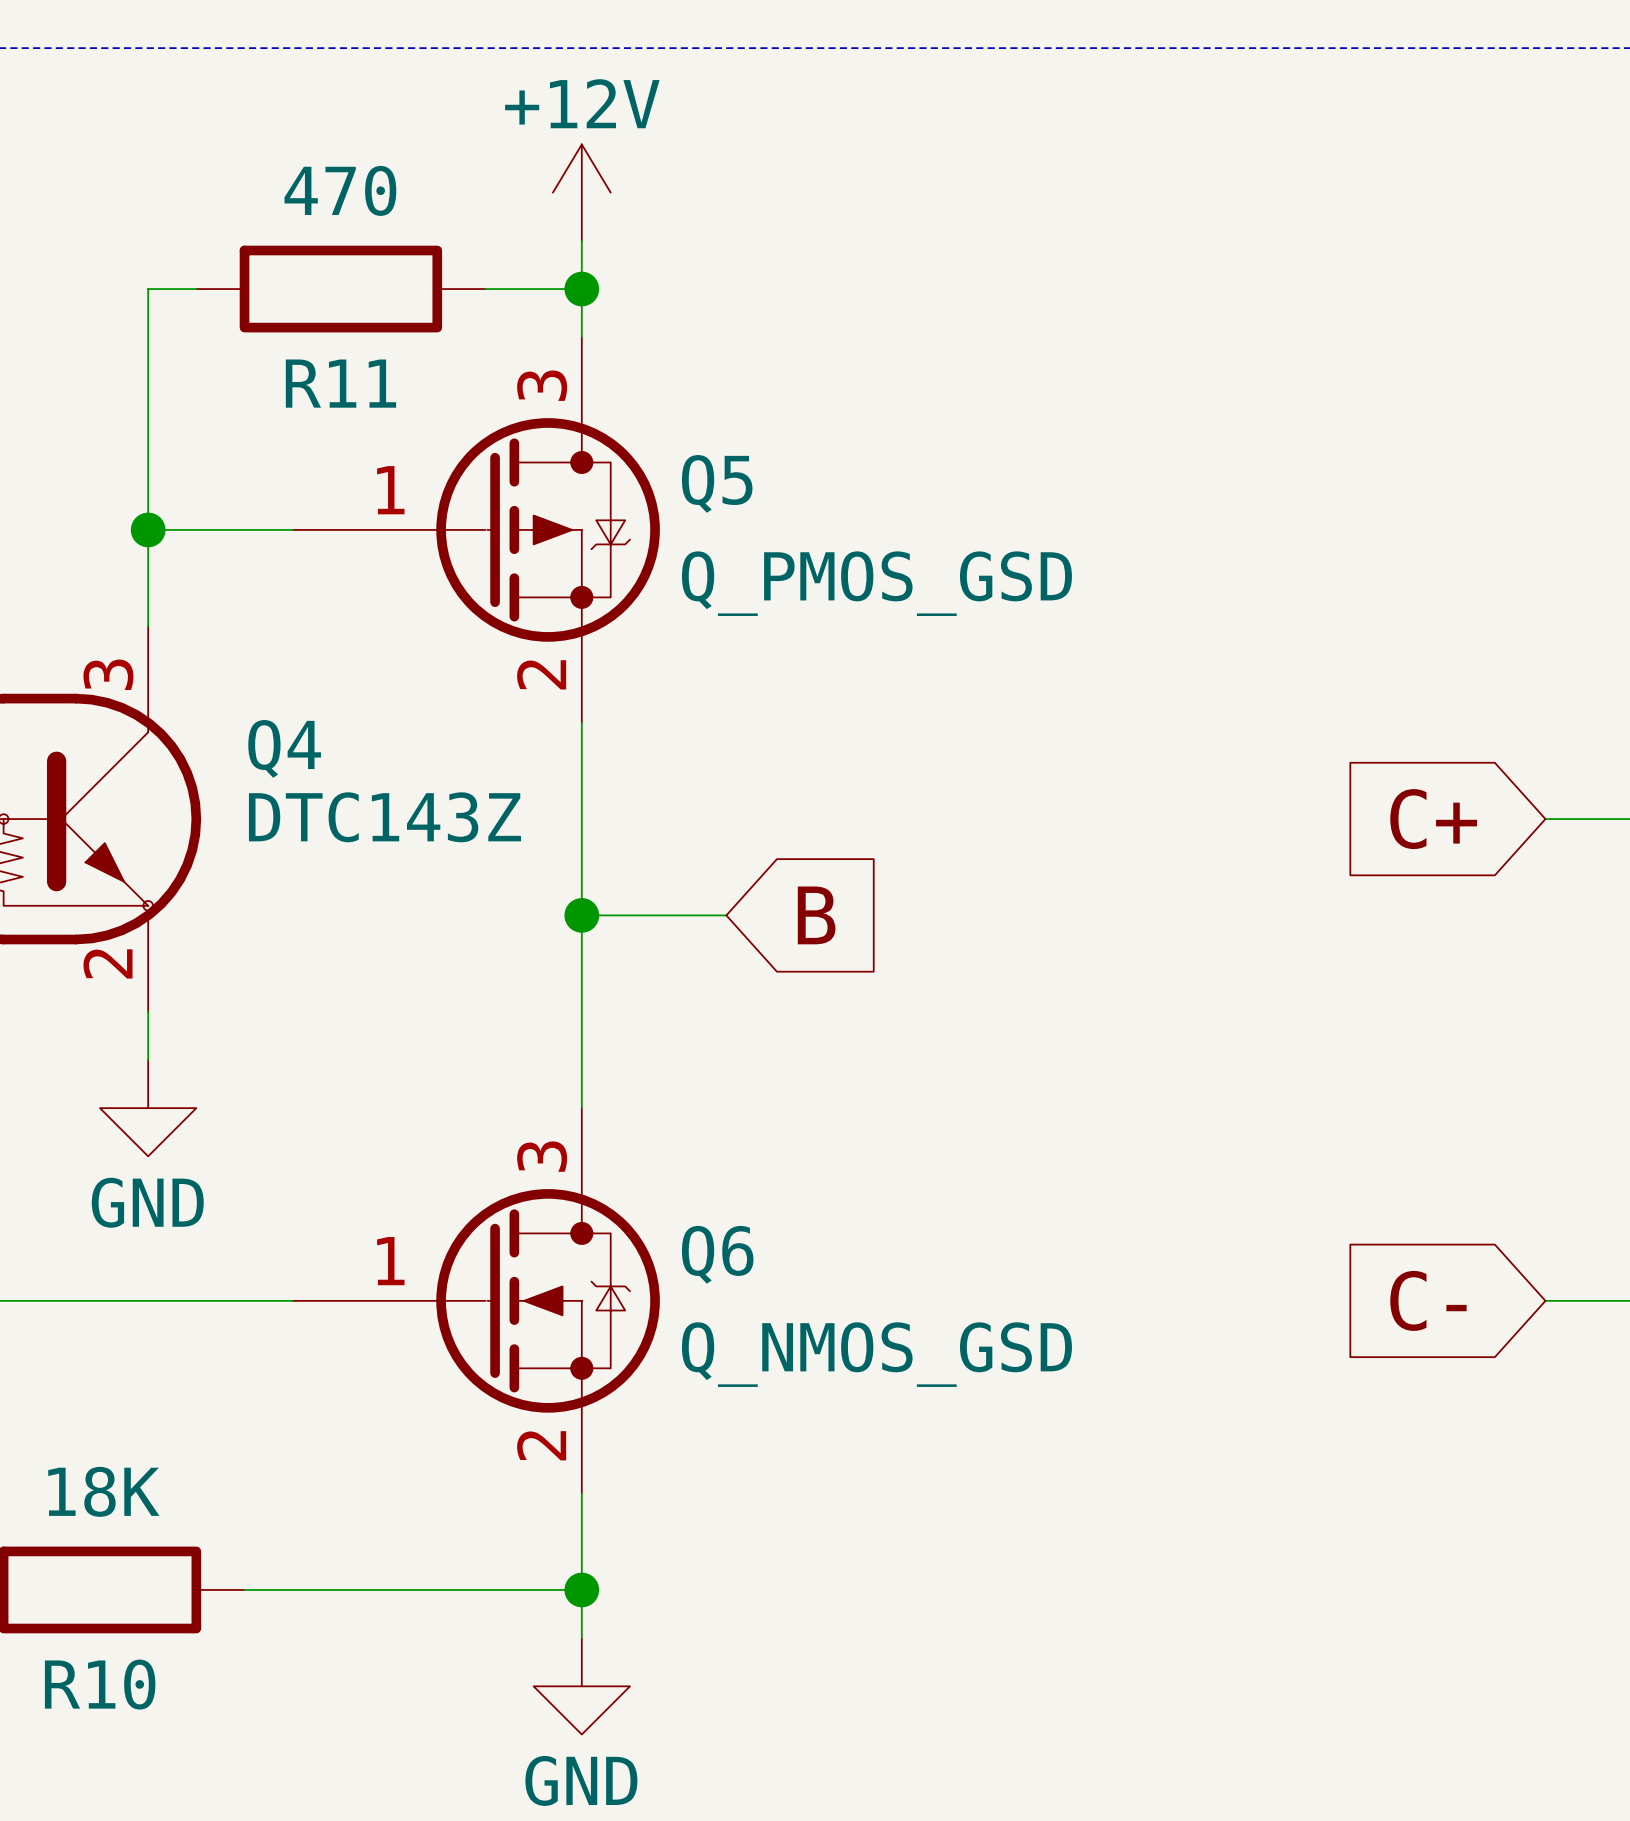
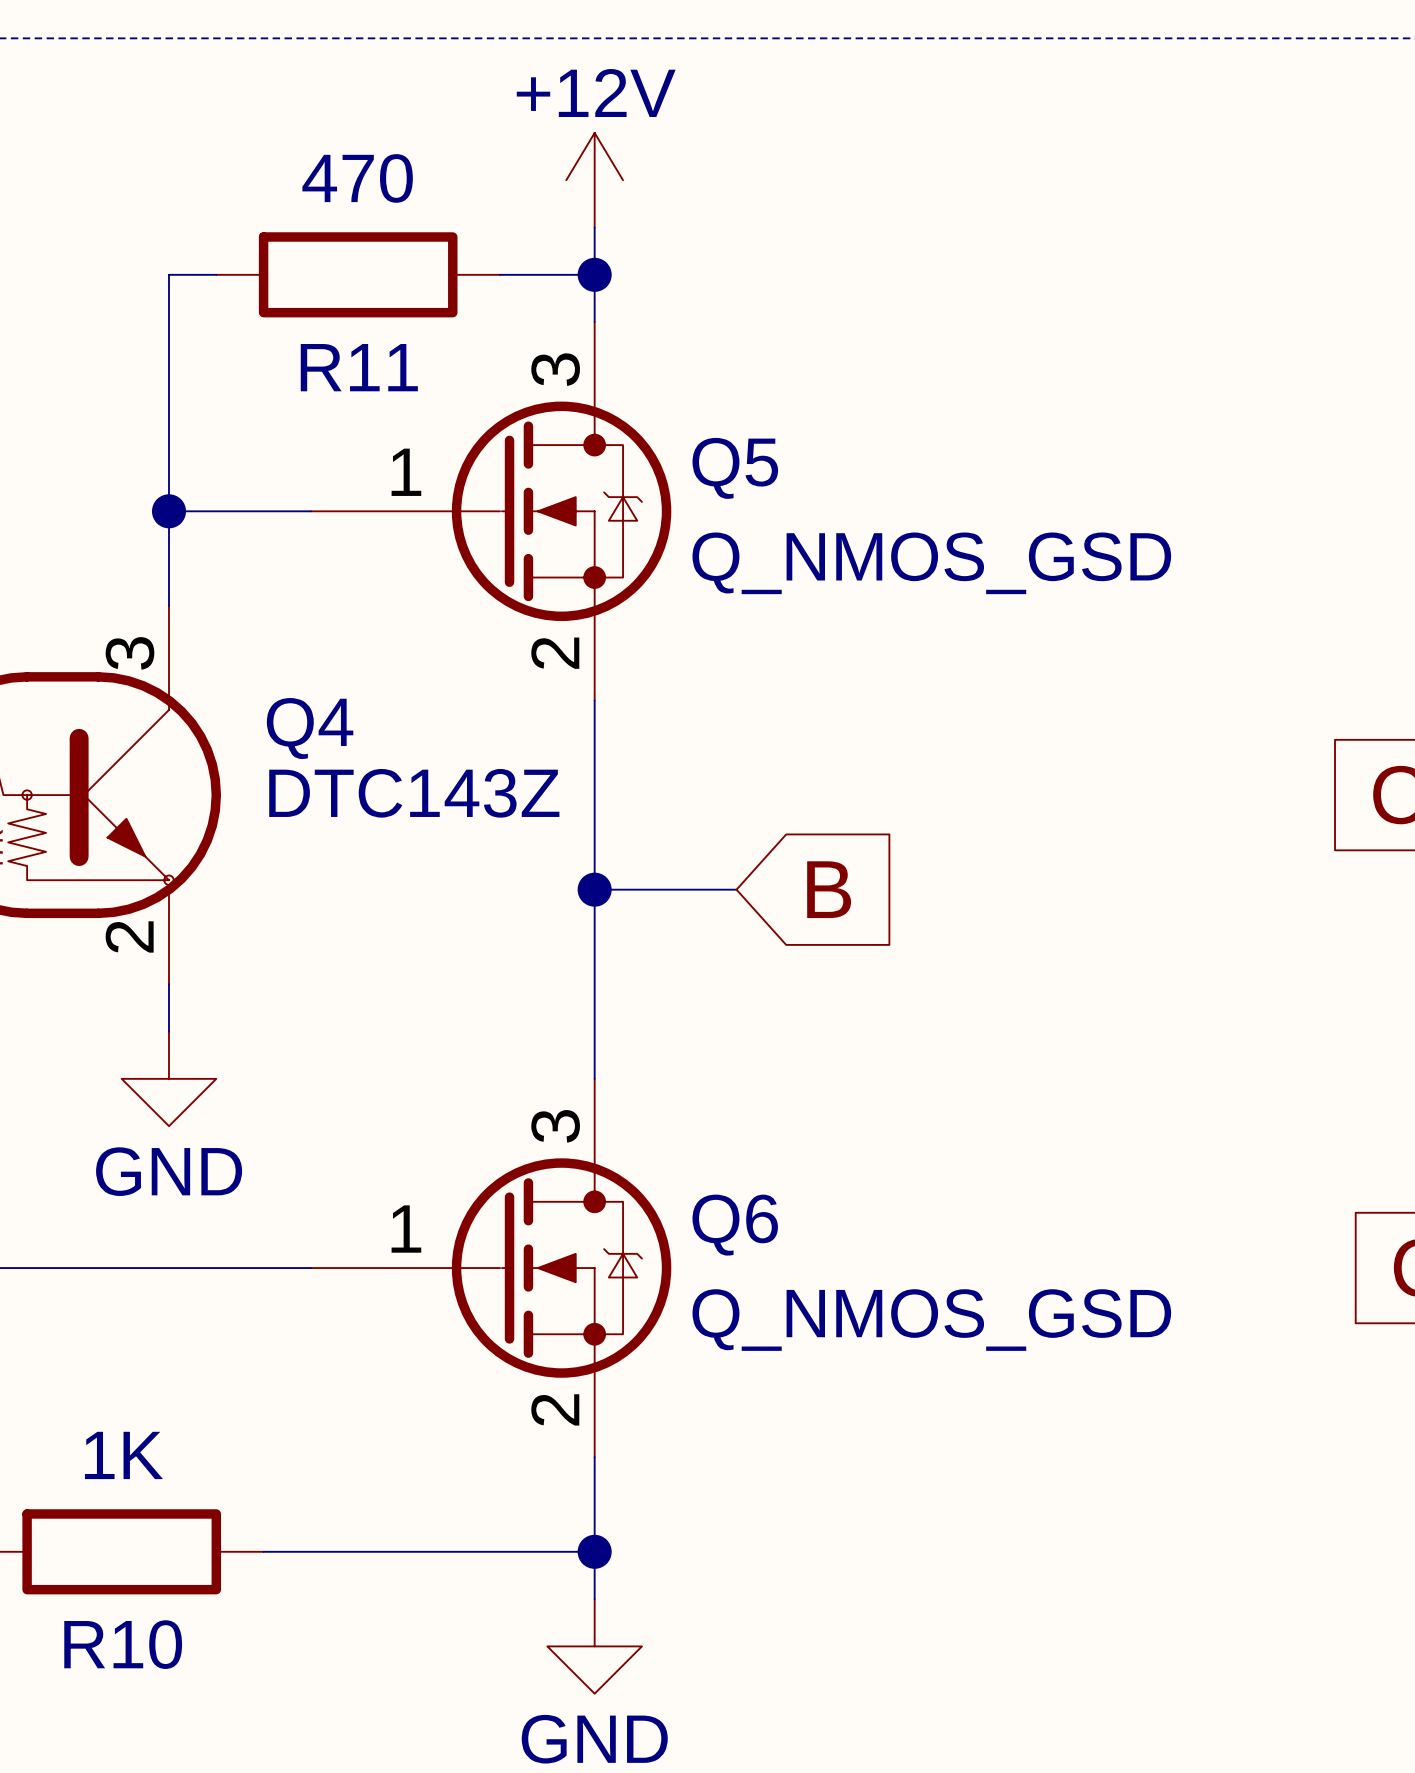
Q5 symbol: [292, 337, 660, 723] -> [310, 322, 672, 701]
Q5 value: Q_PMOS_GSD (876, 583) -> Q_NMOS_GSD (931, 563)
R10 value: 18K (103, 1491) -> 1K (123, 1455)

